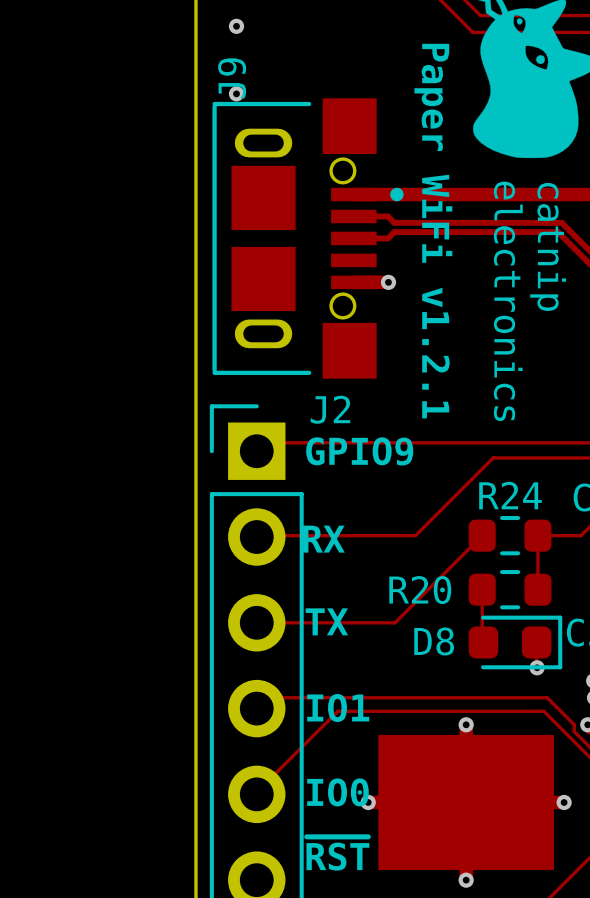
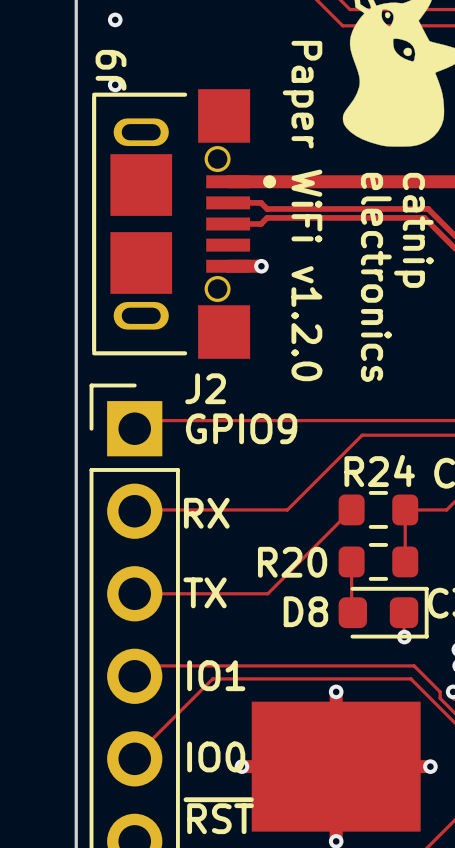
text: Paper WiFi v1.2.1 (433, 231) -> Paper WiFi v1.2.0 (302, 211)

